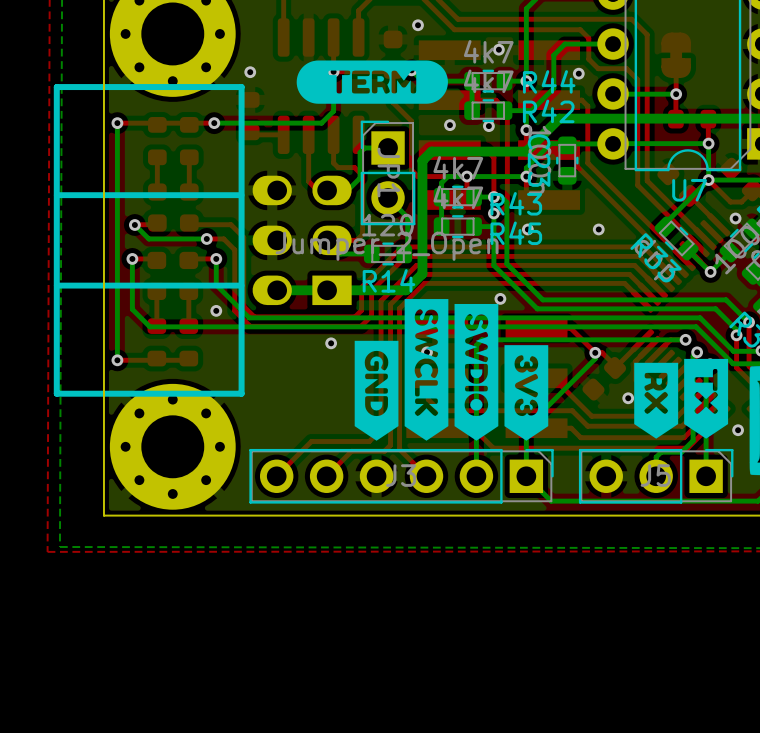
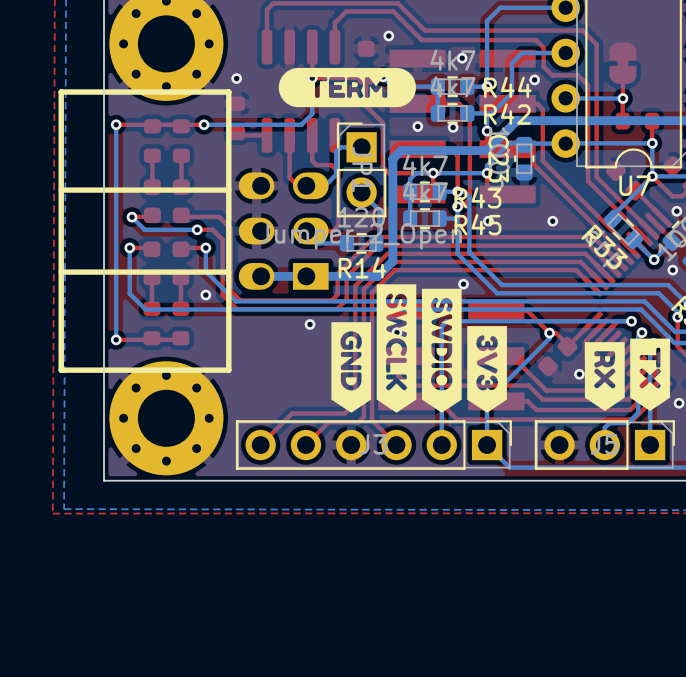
via: none -> (672, 270)

